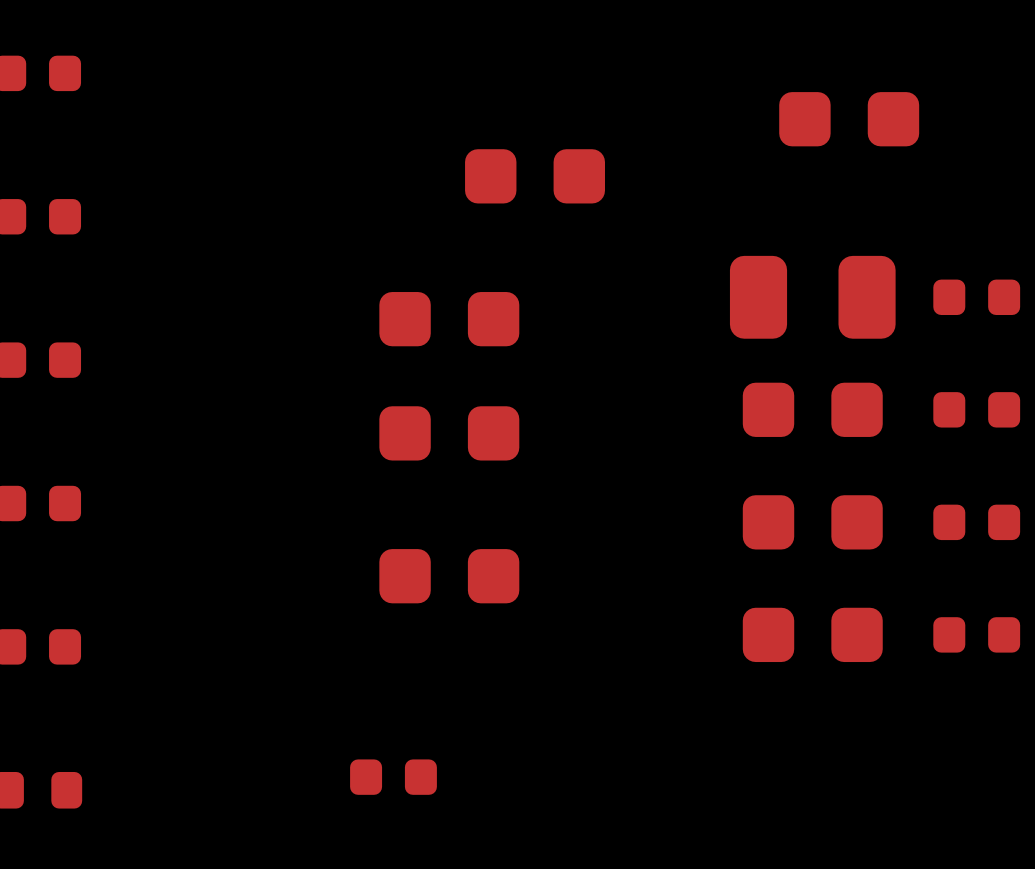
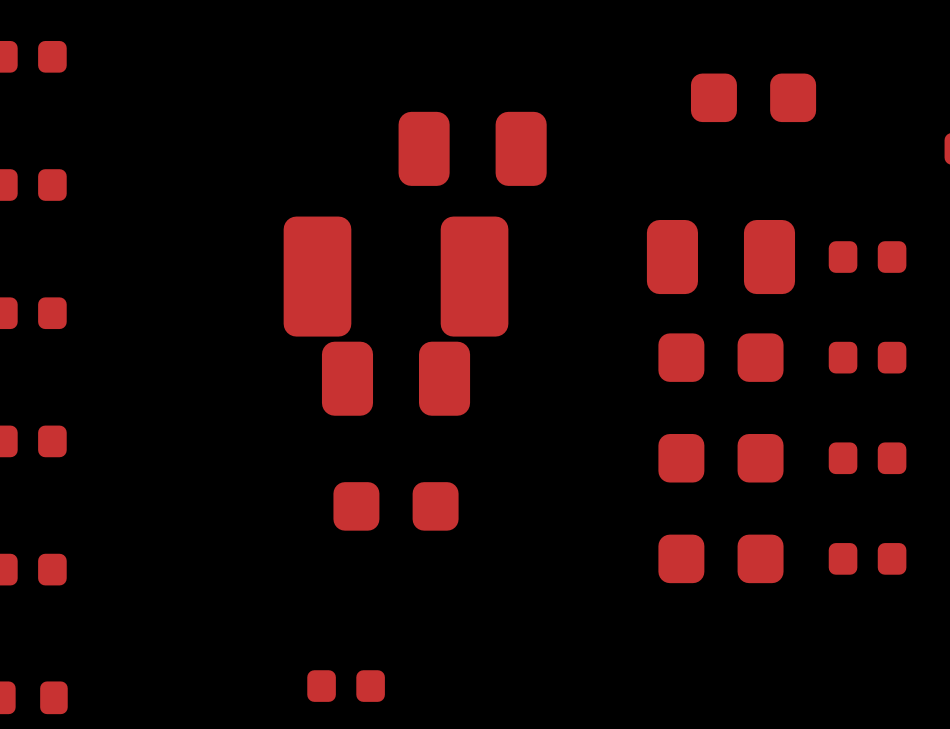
part footprint: [465, 149, 605, 204] -> [398, 111, 547, 186]
part footprint: [379, 292, 520, 347] -> [283, 216, 509, 337]
part footprint: [379, 406, 520, 461] -> [321, 341, 471, 416]

